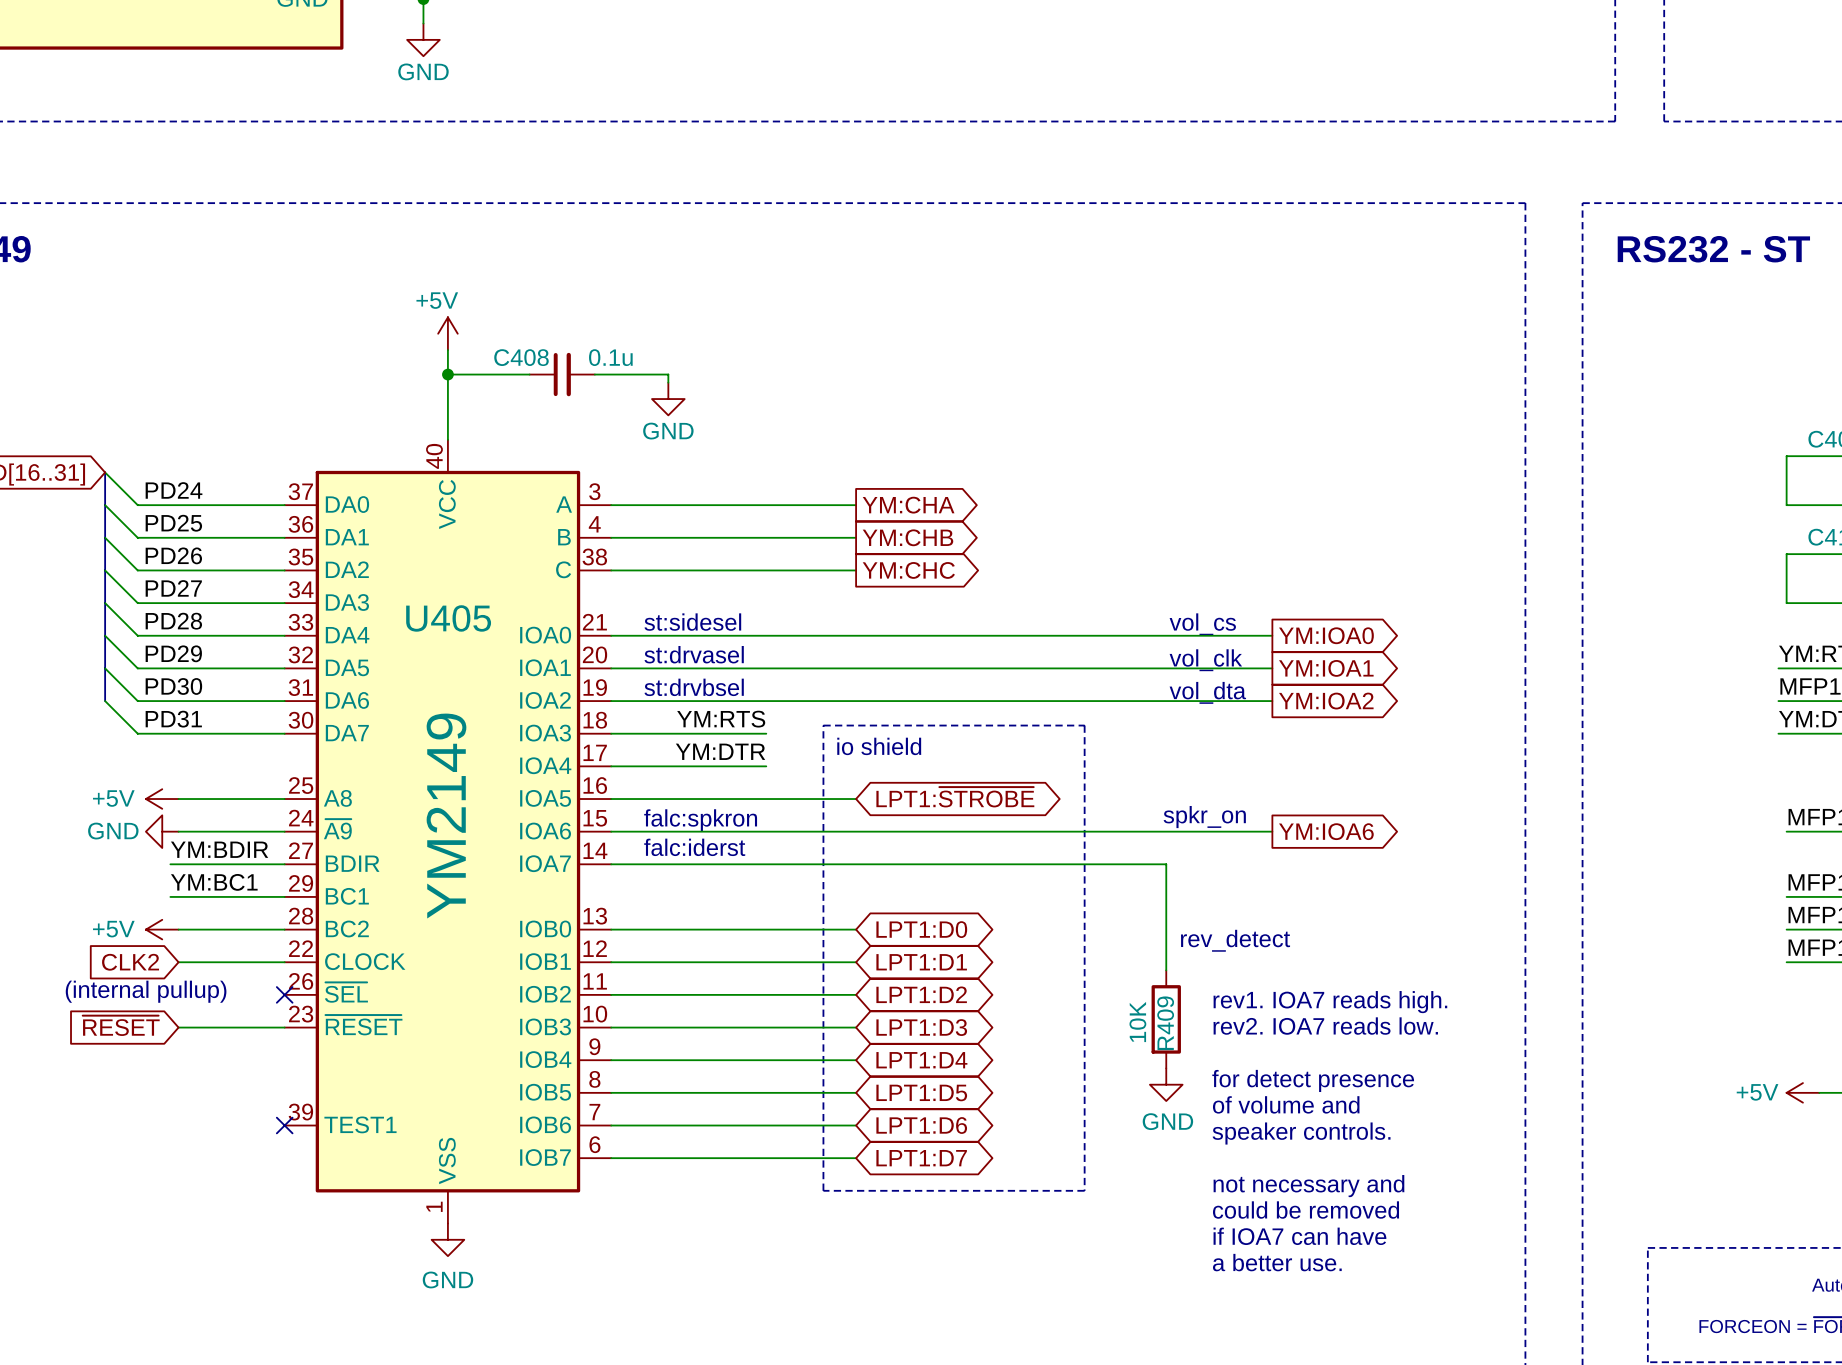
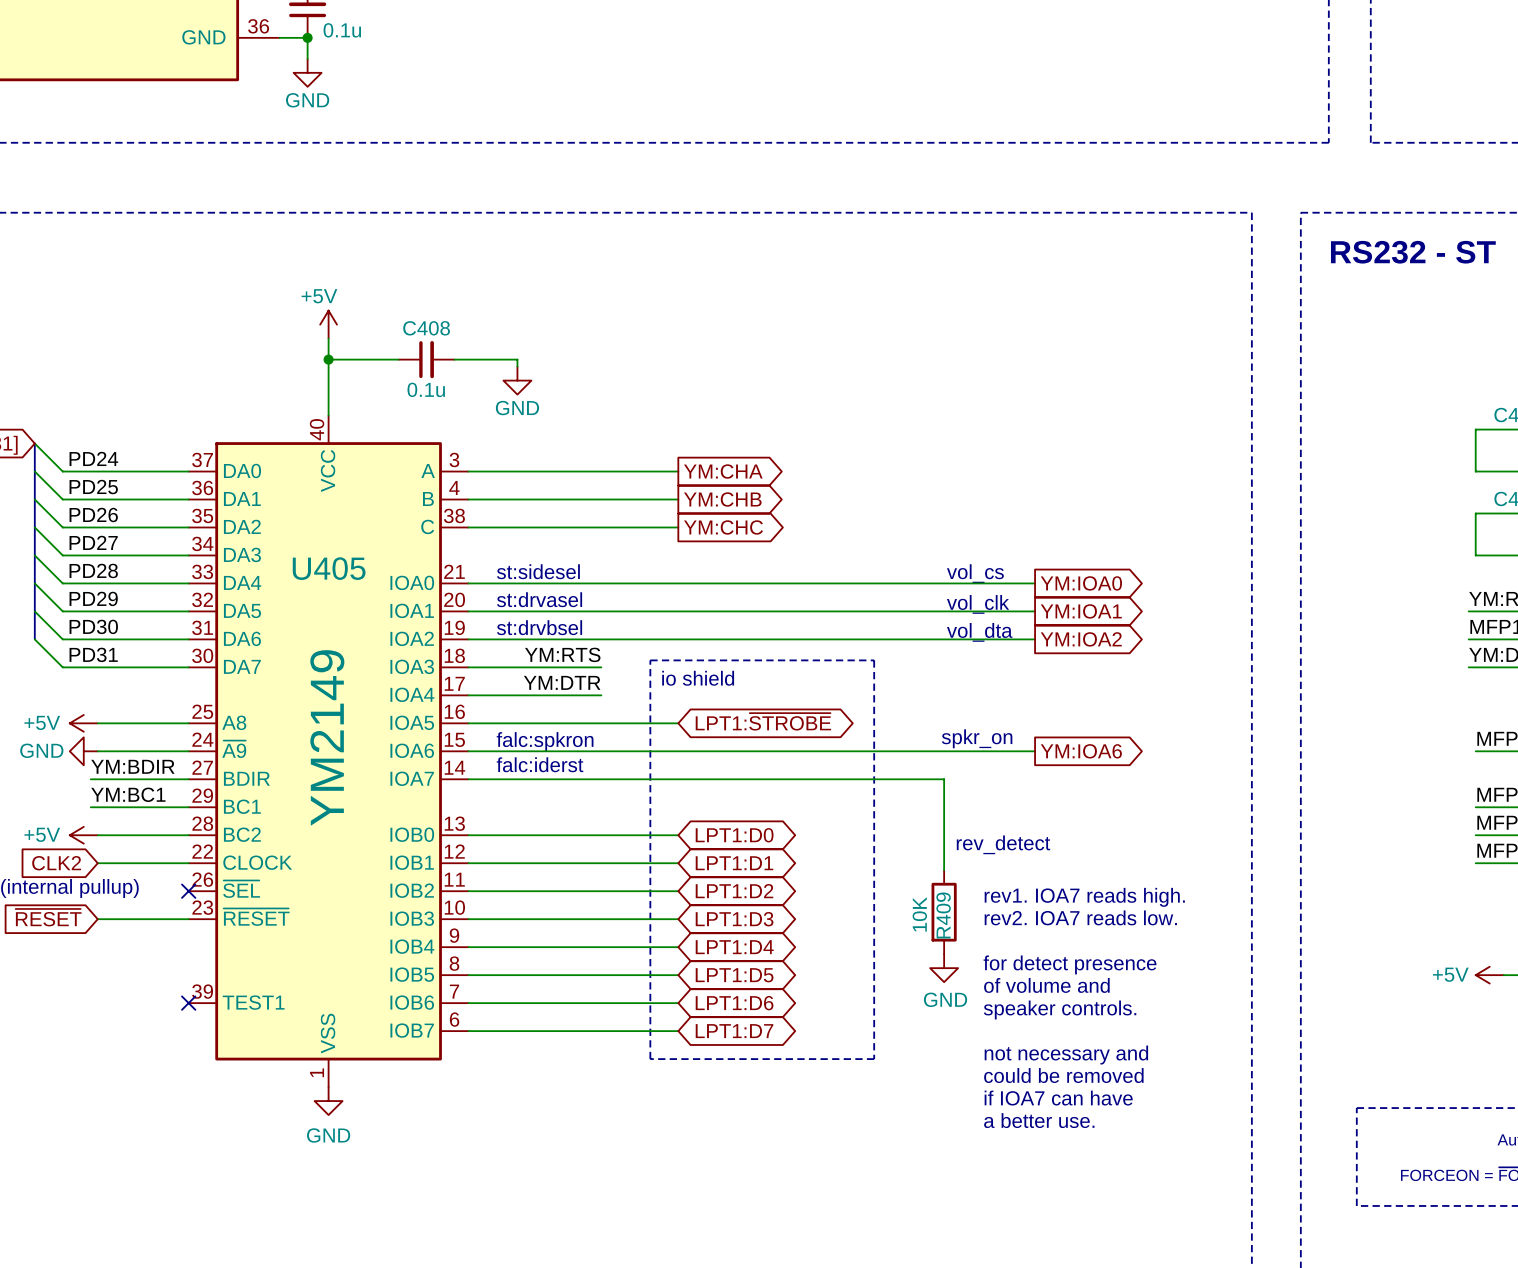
C408 name position: C408 (521, 357) -> C408 (426, 328)
C408 value position: 0.1u (610, 357) -> 0.1u (426, 389)

